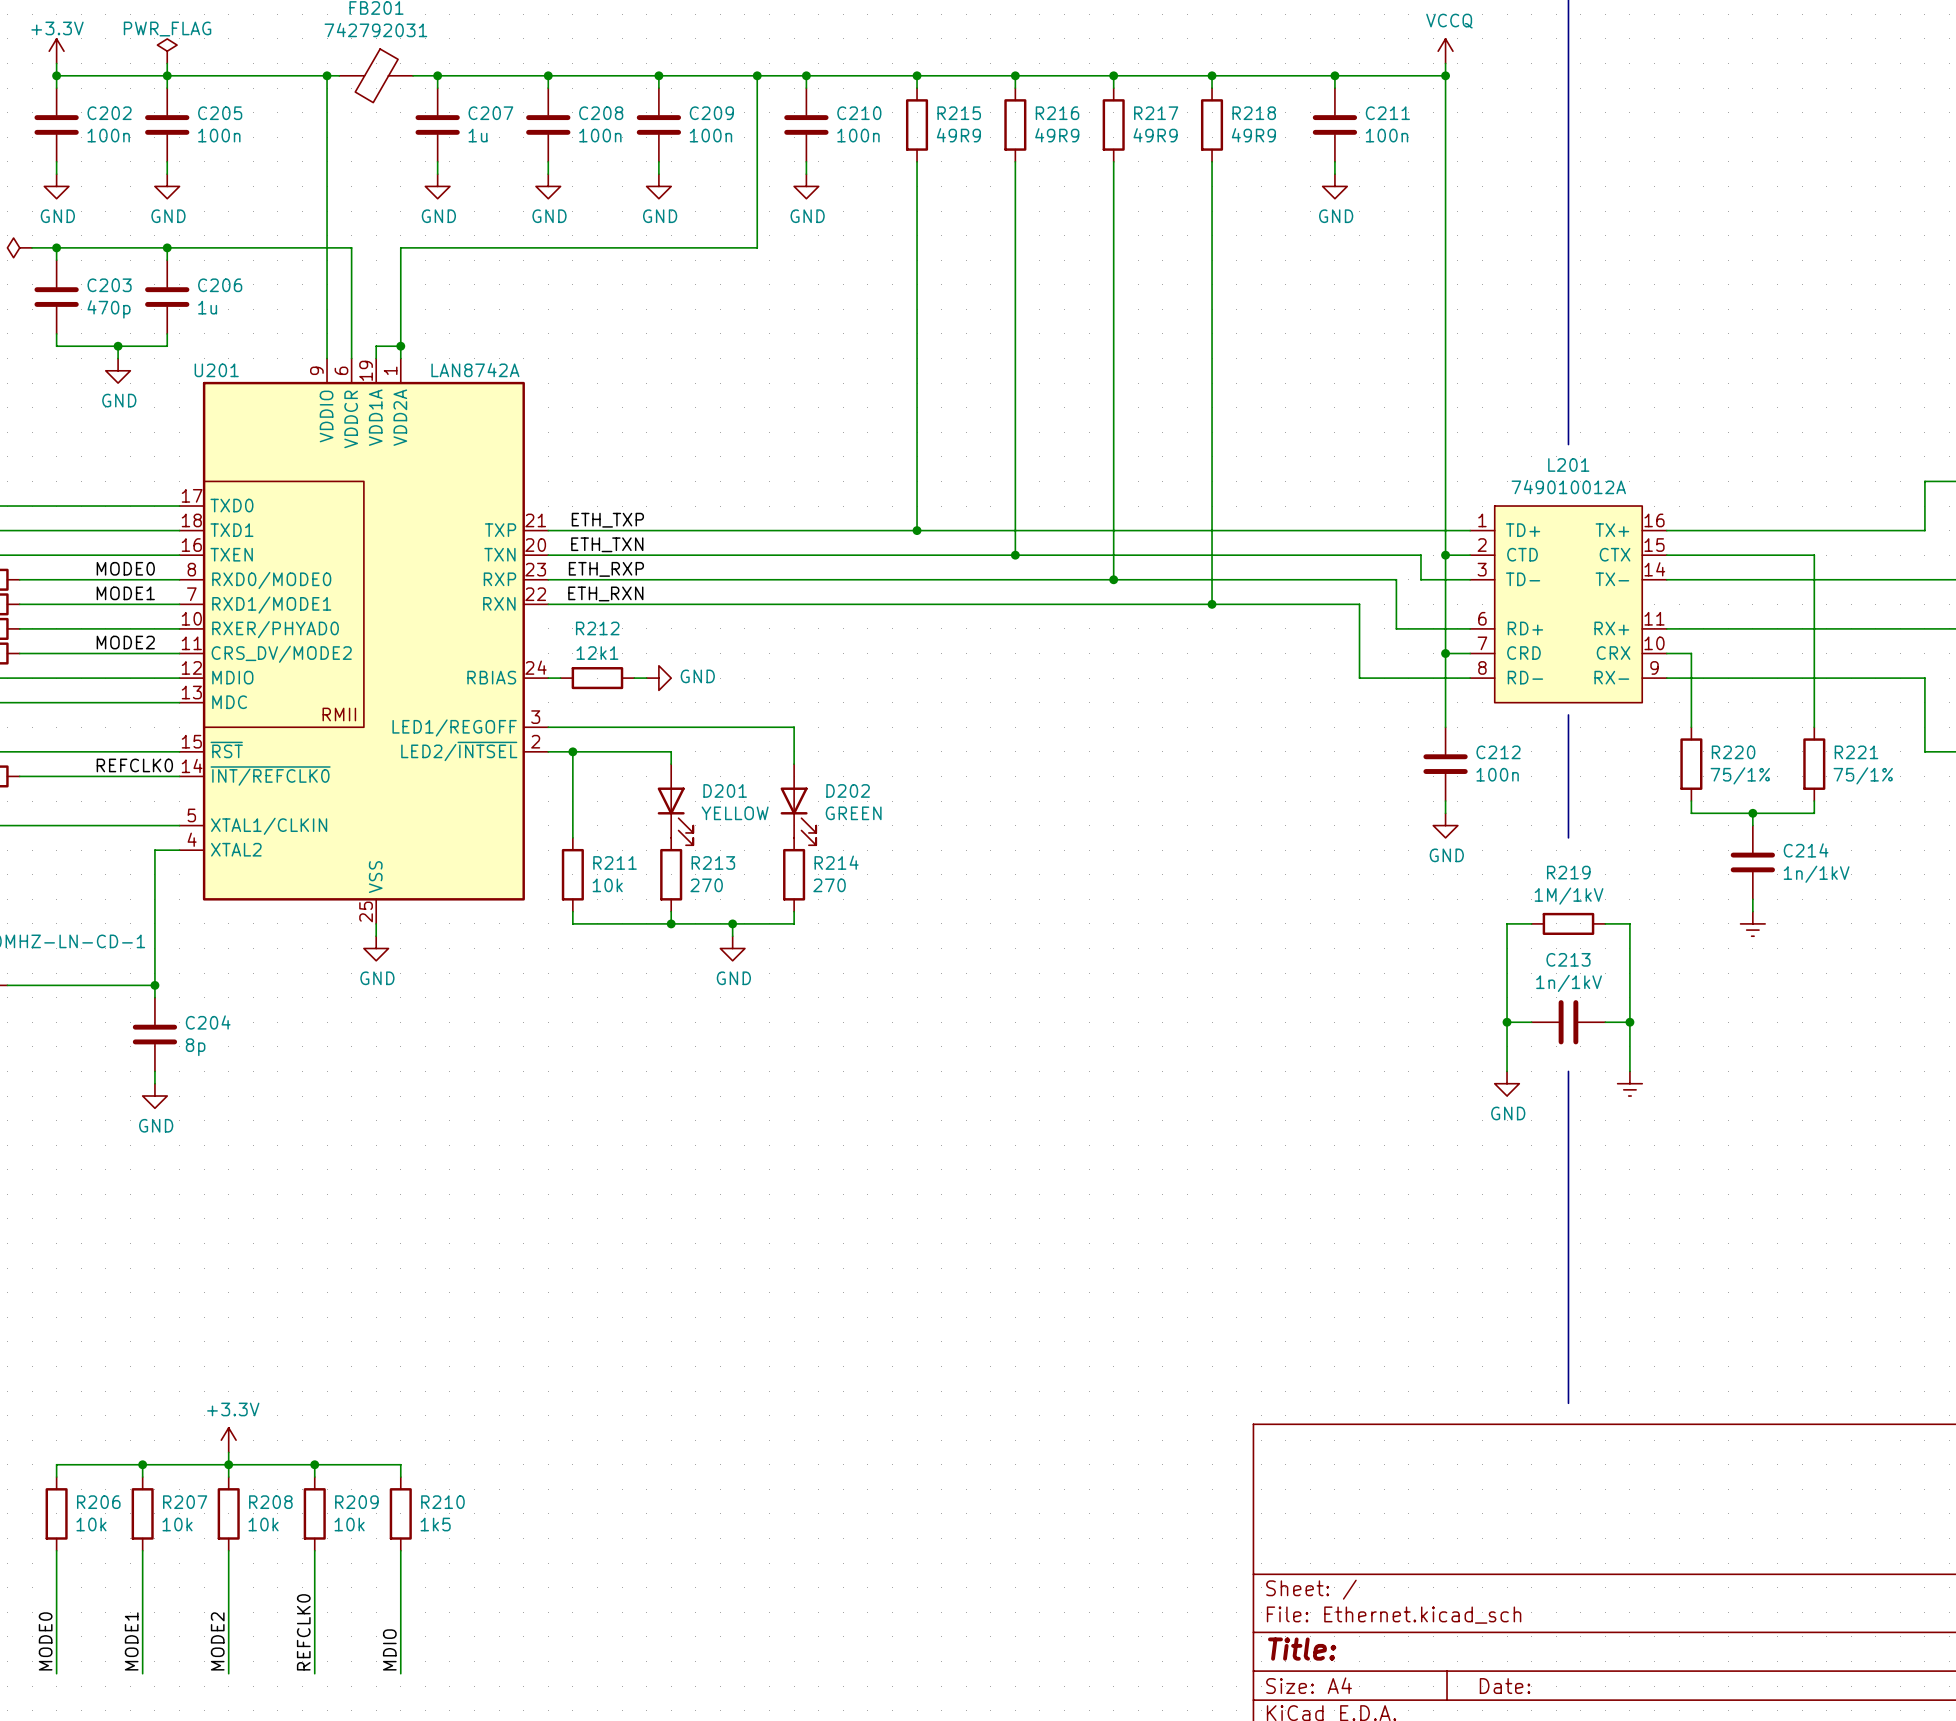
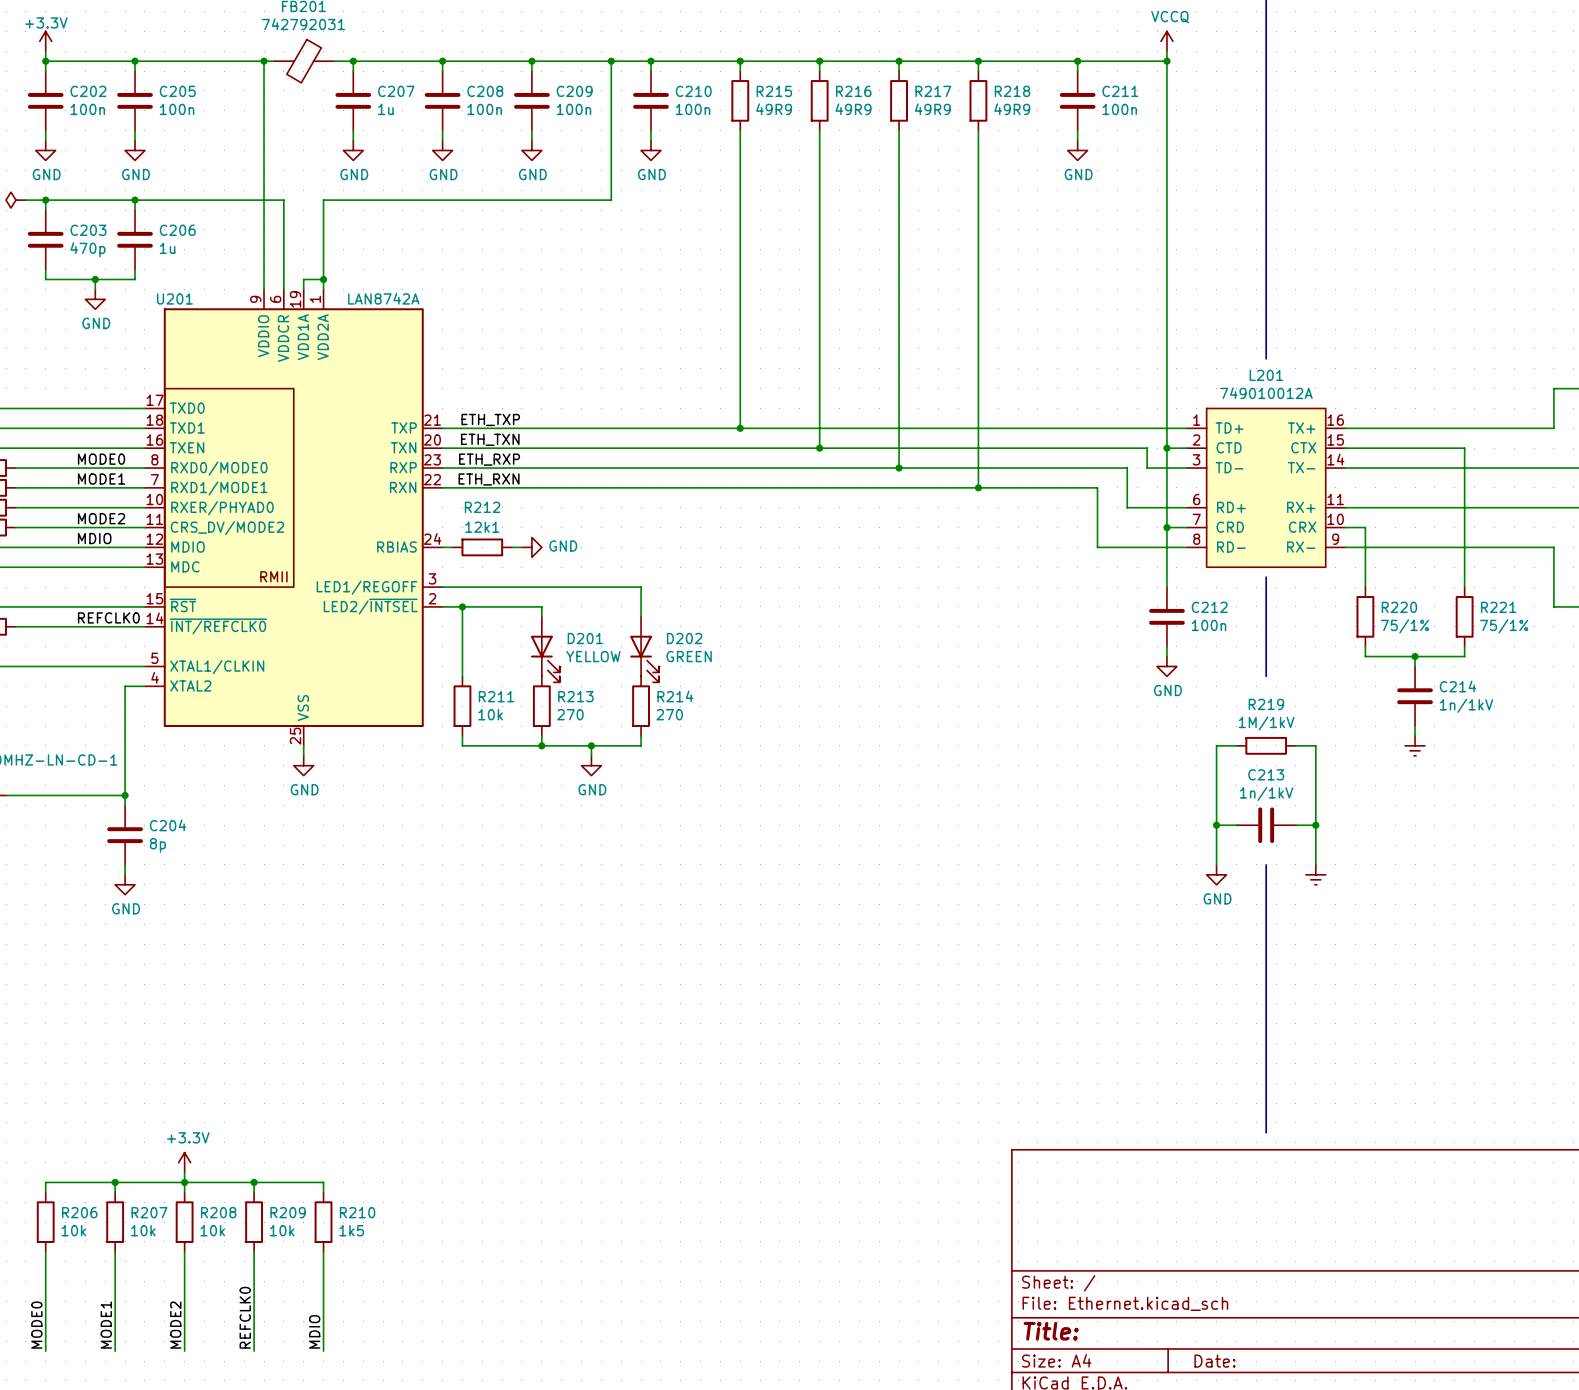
power symbol: PWR_FLAG (167, 51) -> none
wire: (167, 63) (167, 75) -> none
label: none -> MDIO (94, 538)

